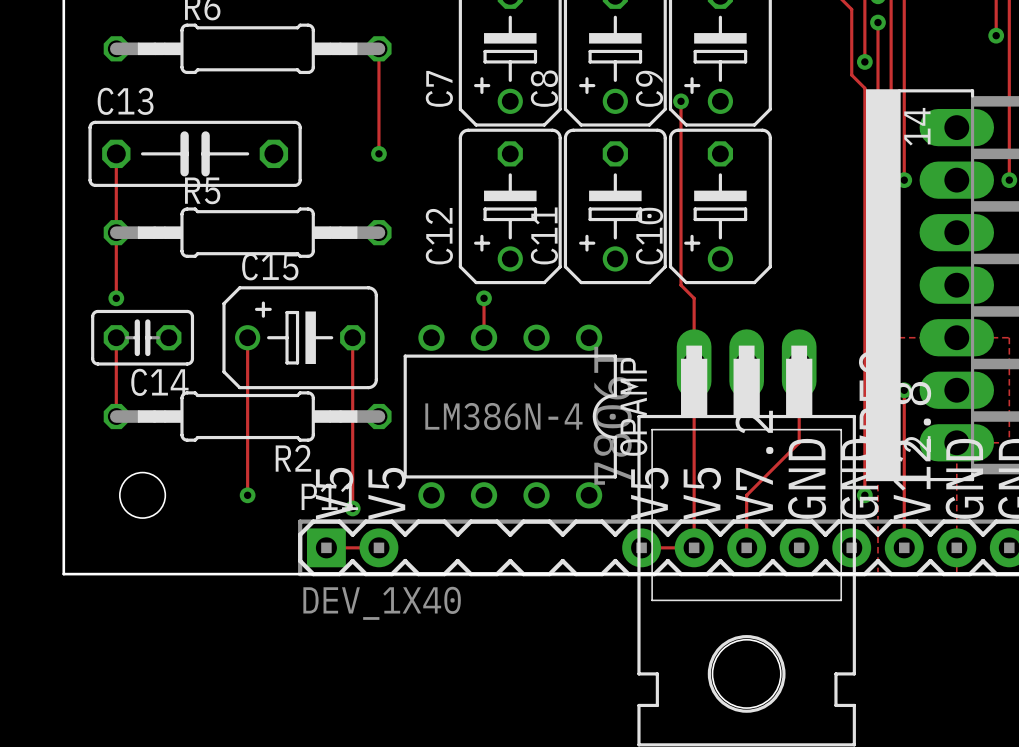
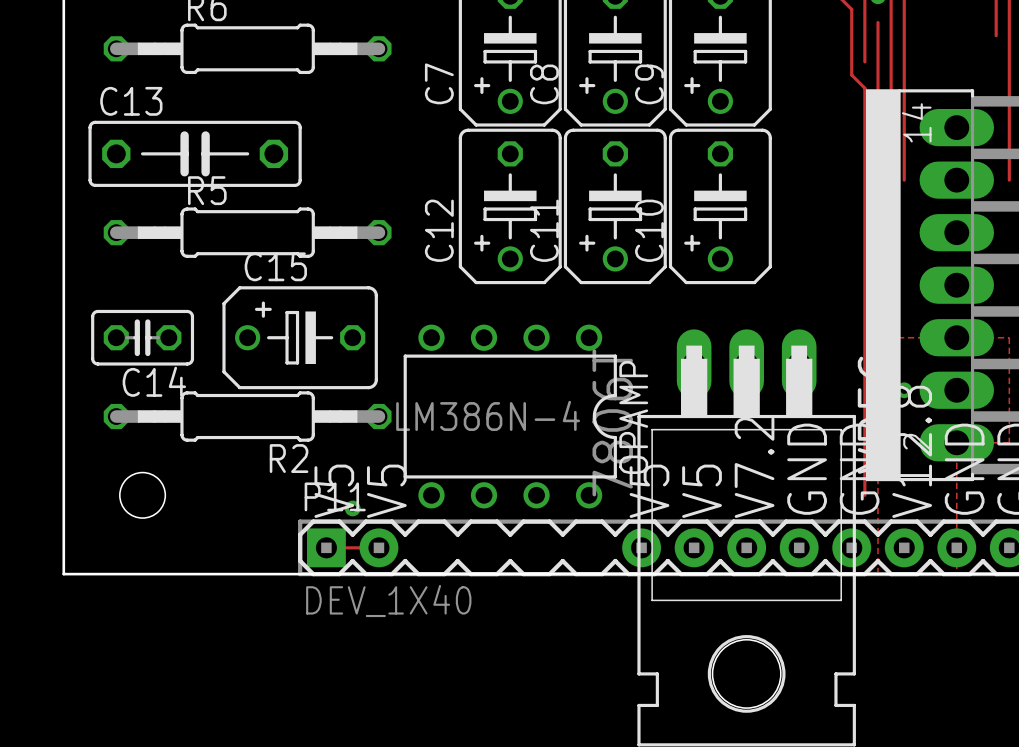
via: (877, 22) -> none
via: (996, 35) -> none
track: (378, 48) (378, 153) -> none
via: (864, 61) -> none
track: (681, 101) (681, 285) (694, 298) (694, 547) (641, 547) -> none
via: (681, 101) -> none
track: (116, 153) (116, 298) -> none
via: (378, 153) -> none
via: (904, 180) -> none
via: (1009, 180) -> none
via: (116, 298) -> none
track: (484, 298) (484, 337) -> none
via: (484, 298) -> none
track: (116, 337) (116, 416) -> none
track: (247, 337) (247, 495) -> none
track: (352, 337) (352, 508) -> none
track: (799, 363) (799, 442) (746, 495) (746, 547) -> none
track: (904, 390) (904, 547) -> none
via: (247, 495) -> none
via: (864, 495) -> none

